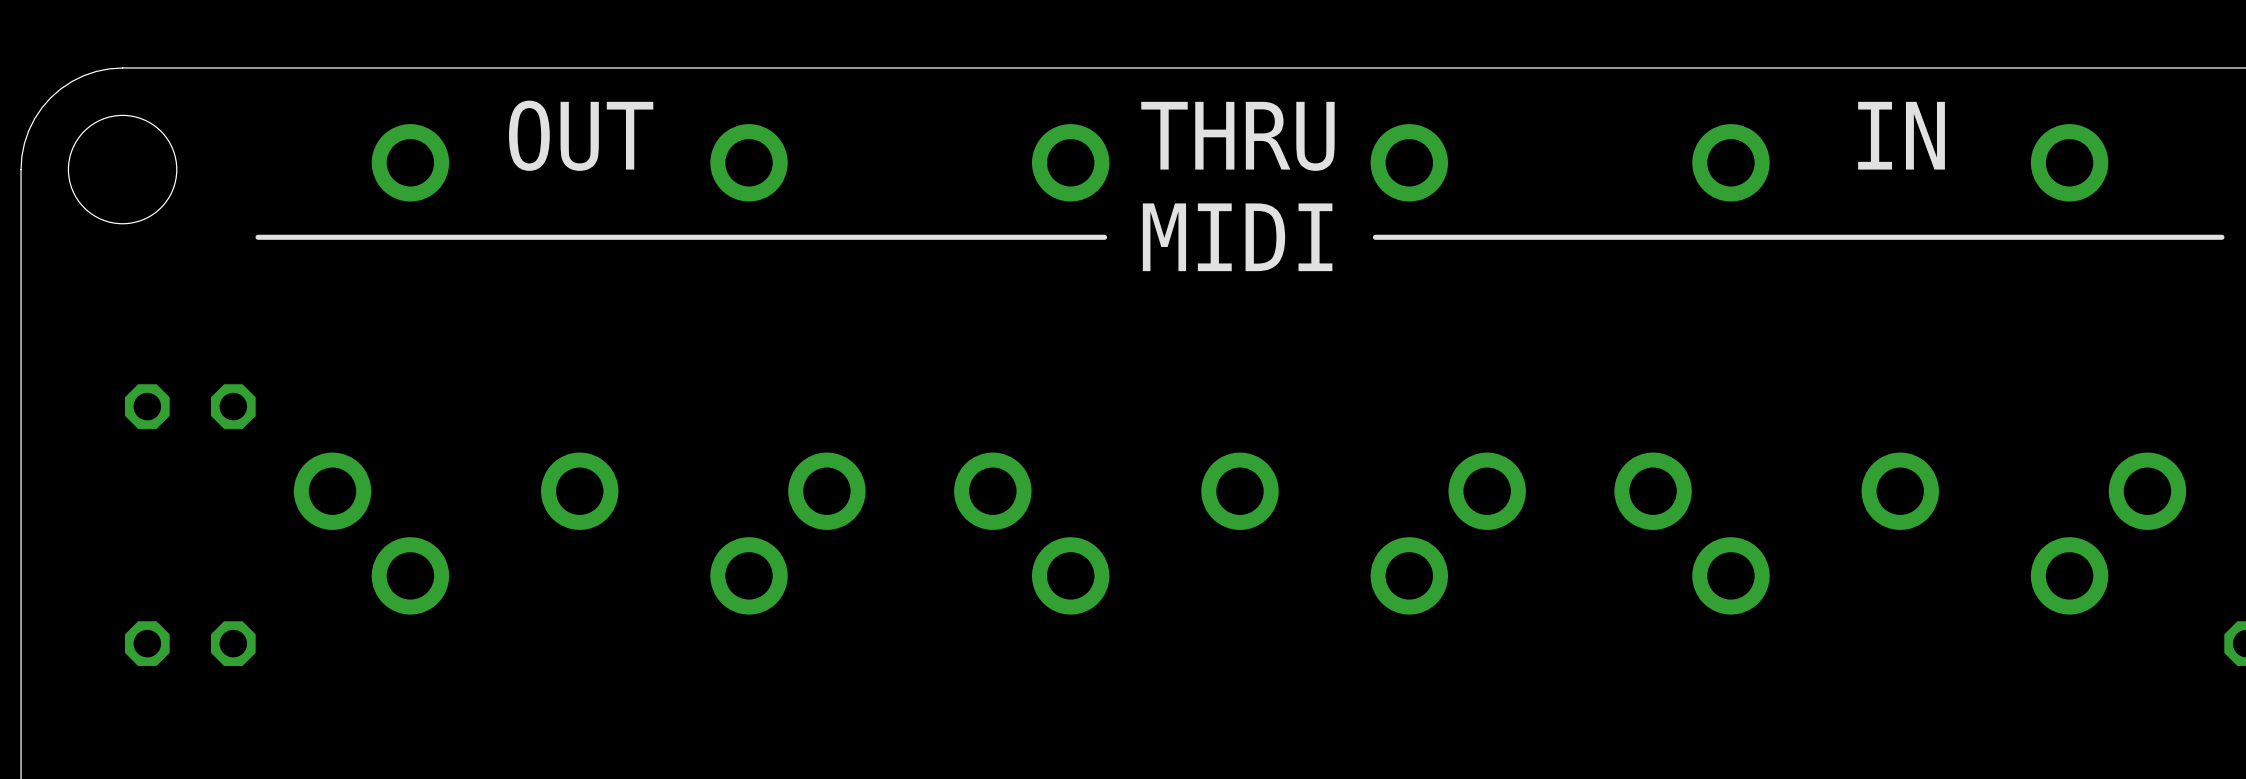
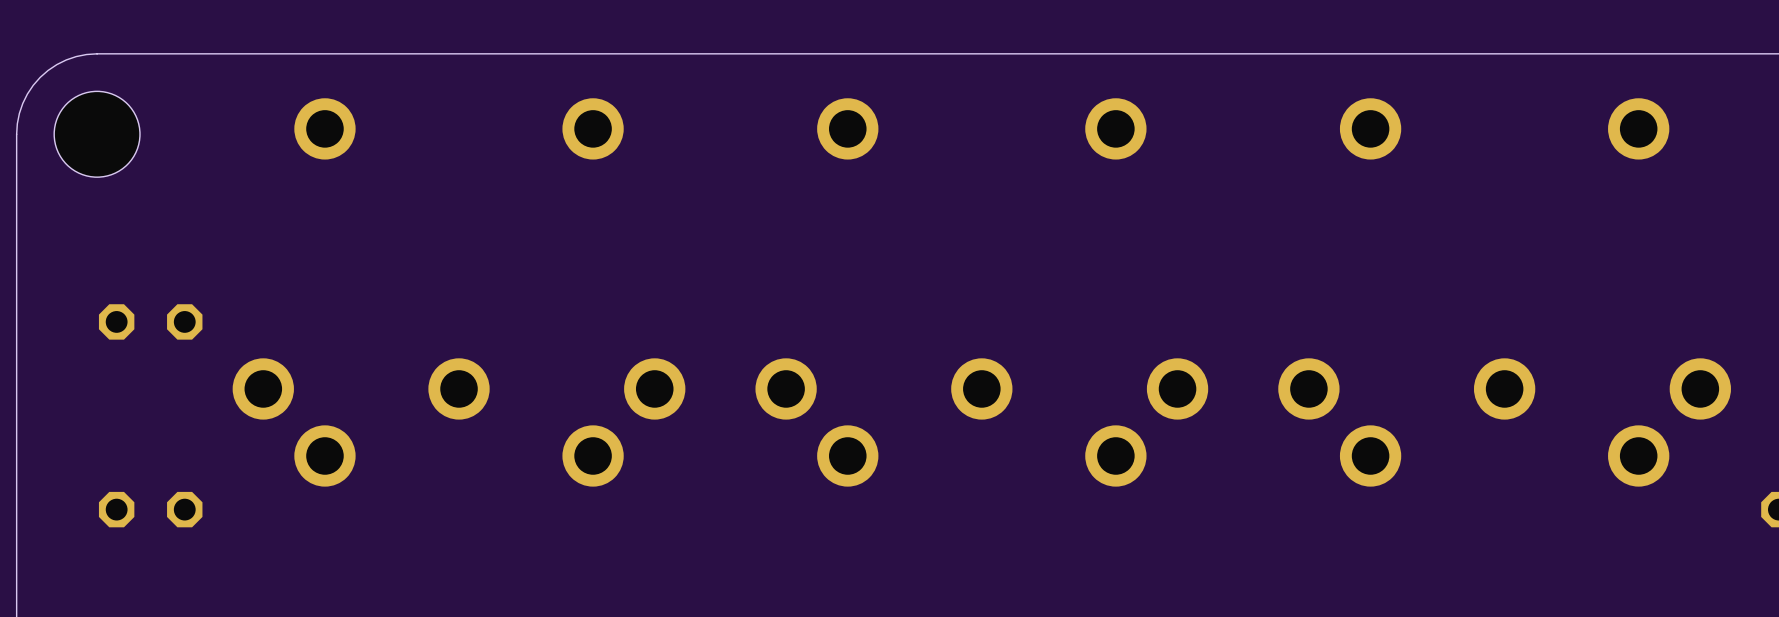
text: OUT (581, 135) -> none
text: IN (1901, 135) -> none
text: THRU (1237, 136) -> none
line: (1104, 237) (258, 237) -> none
text: MIDI (1237, 237) -> none
line: (2221, 237) (1375, 237) -> none

